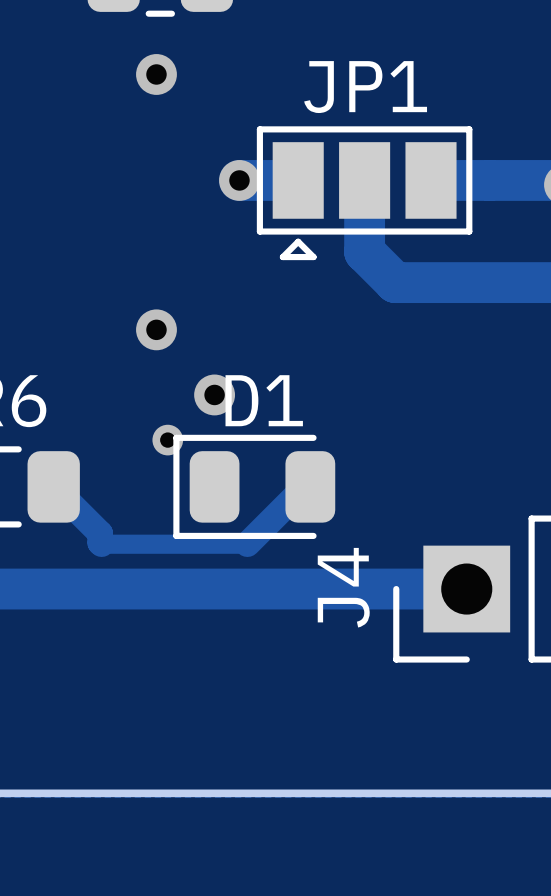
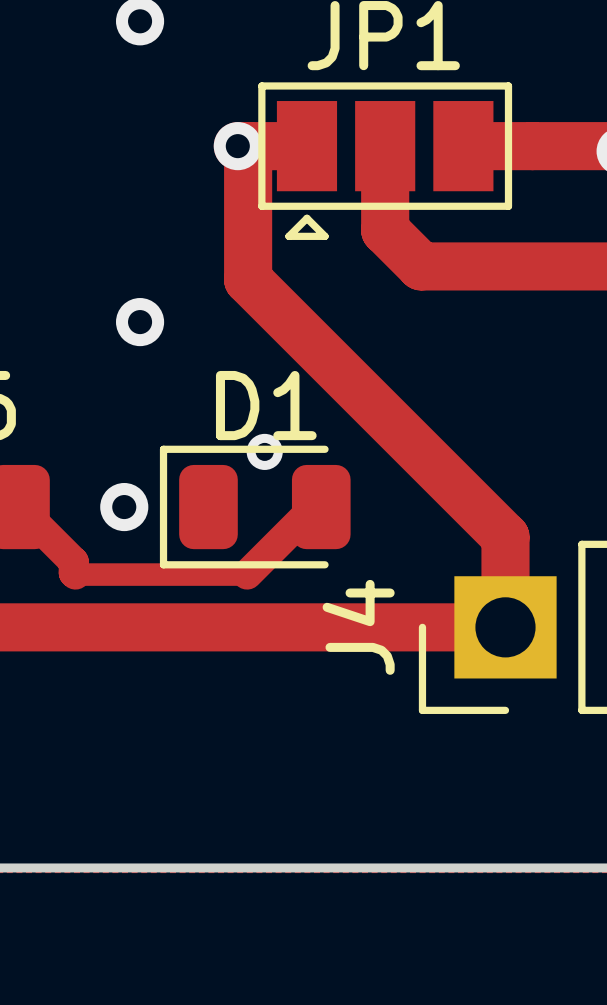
track: none -> (248, 146) (248, 279) (505, 537) (505, 627)
via position: (214, 394) -> (124, 507)
via position: (167, 440) -> (264, 451)

